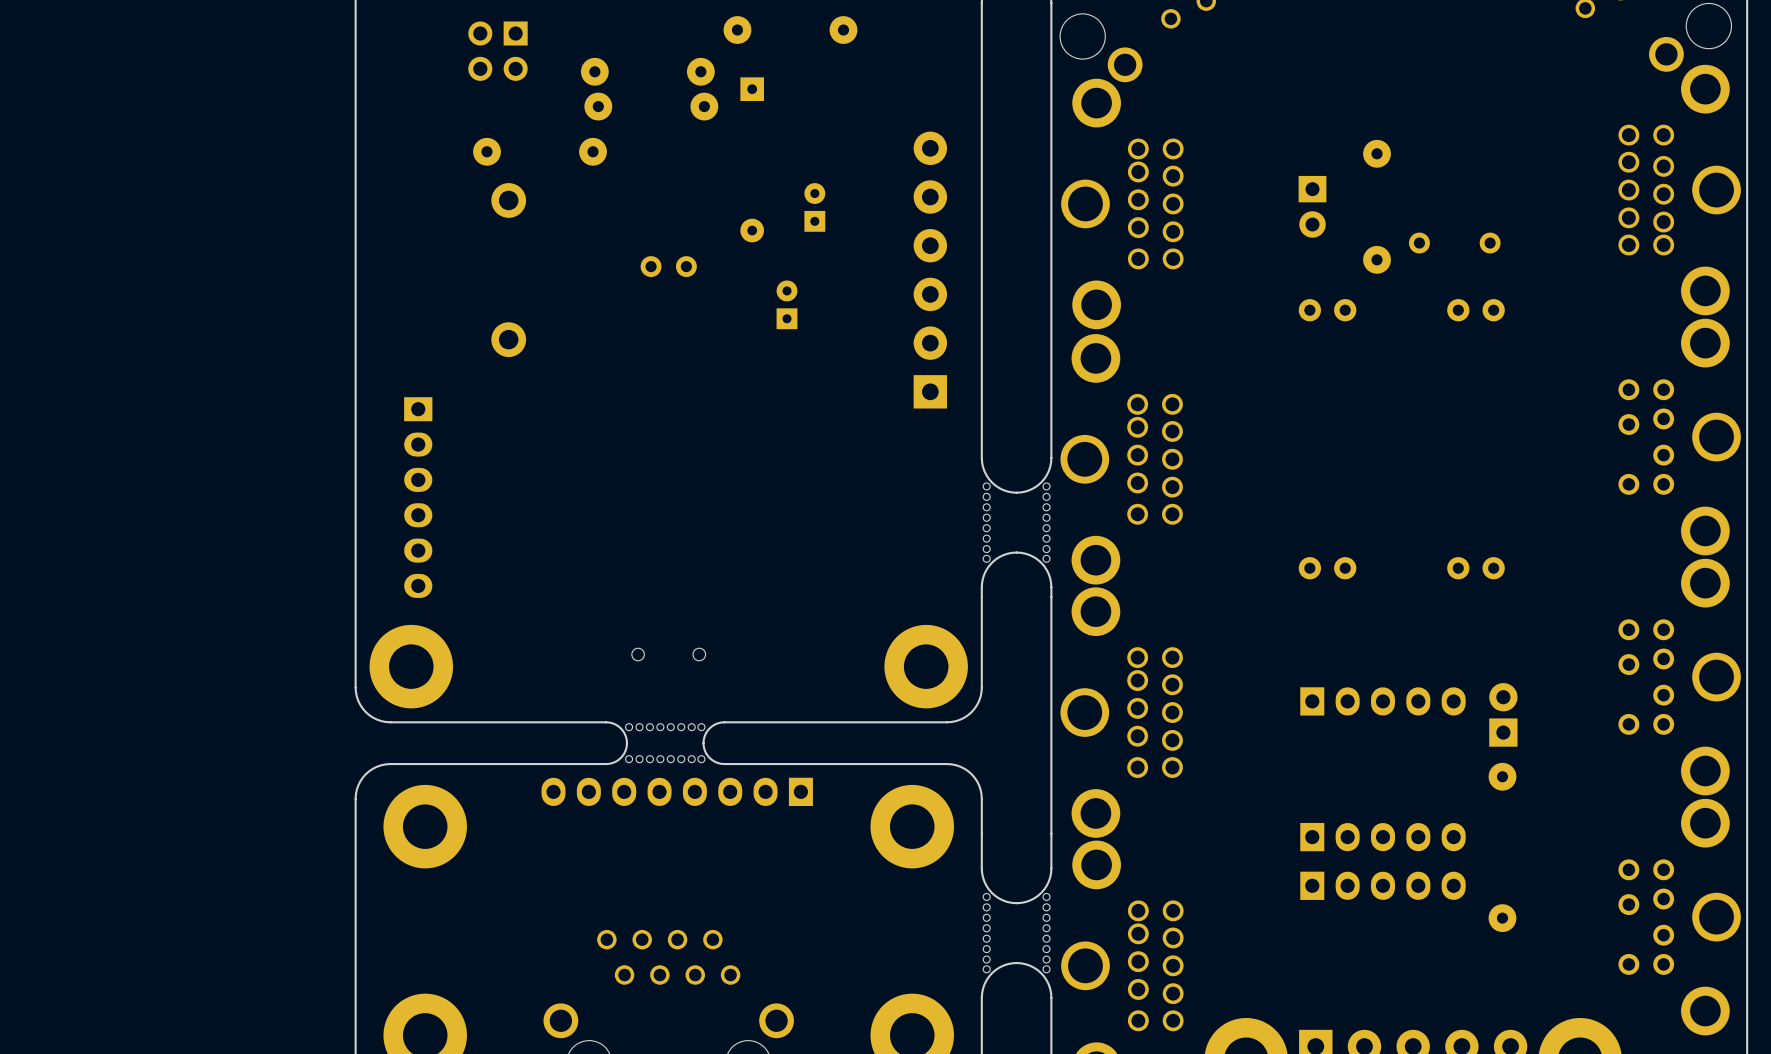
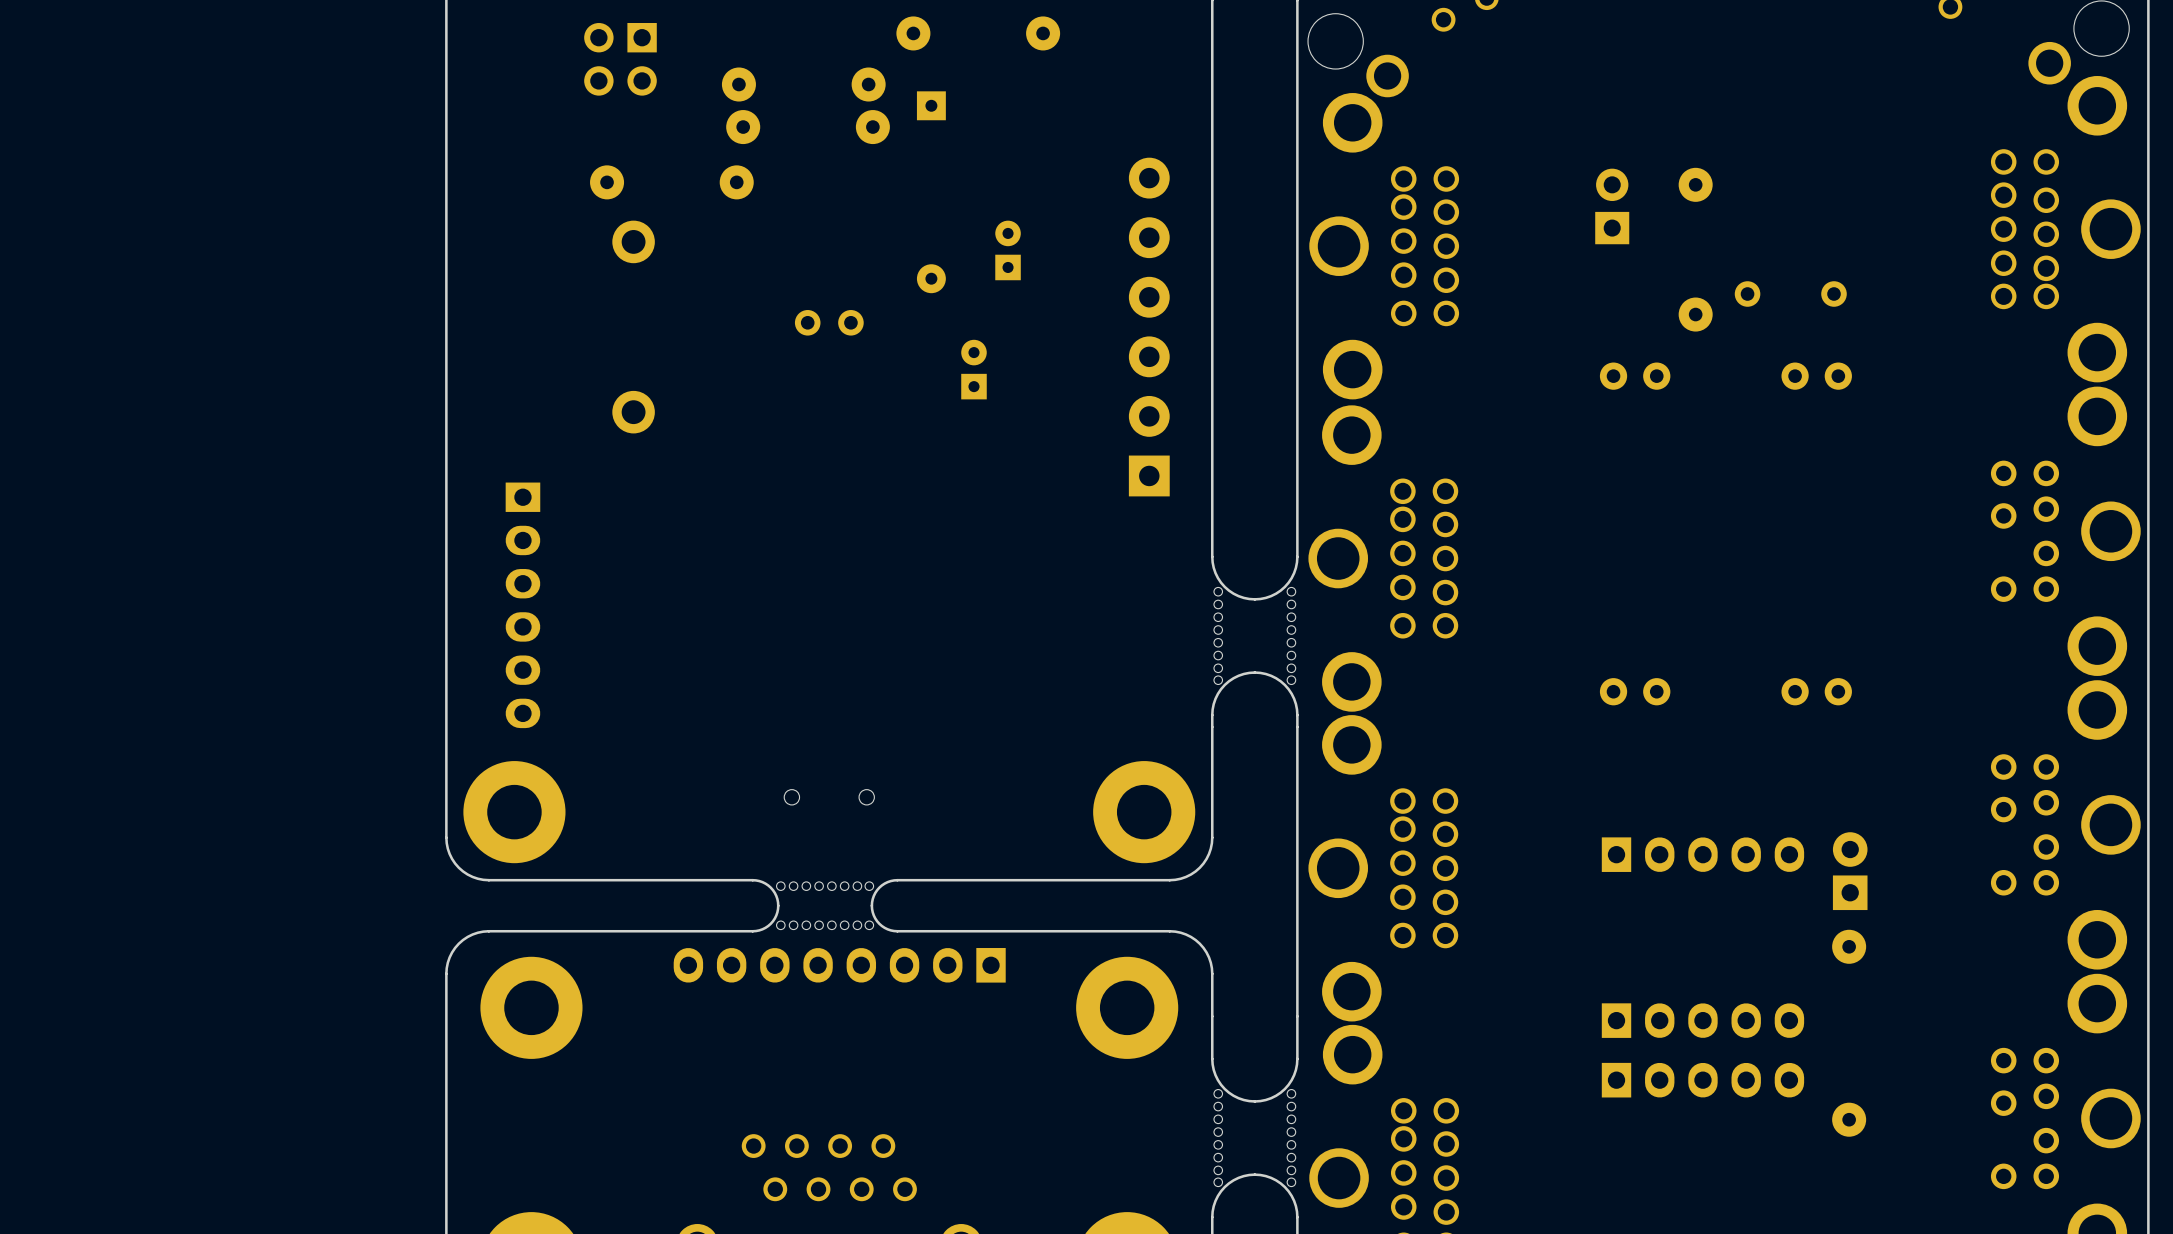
part rotation: 0° (1312, 206) -> 180° (1612, 206)

